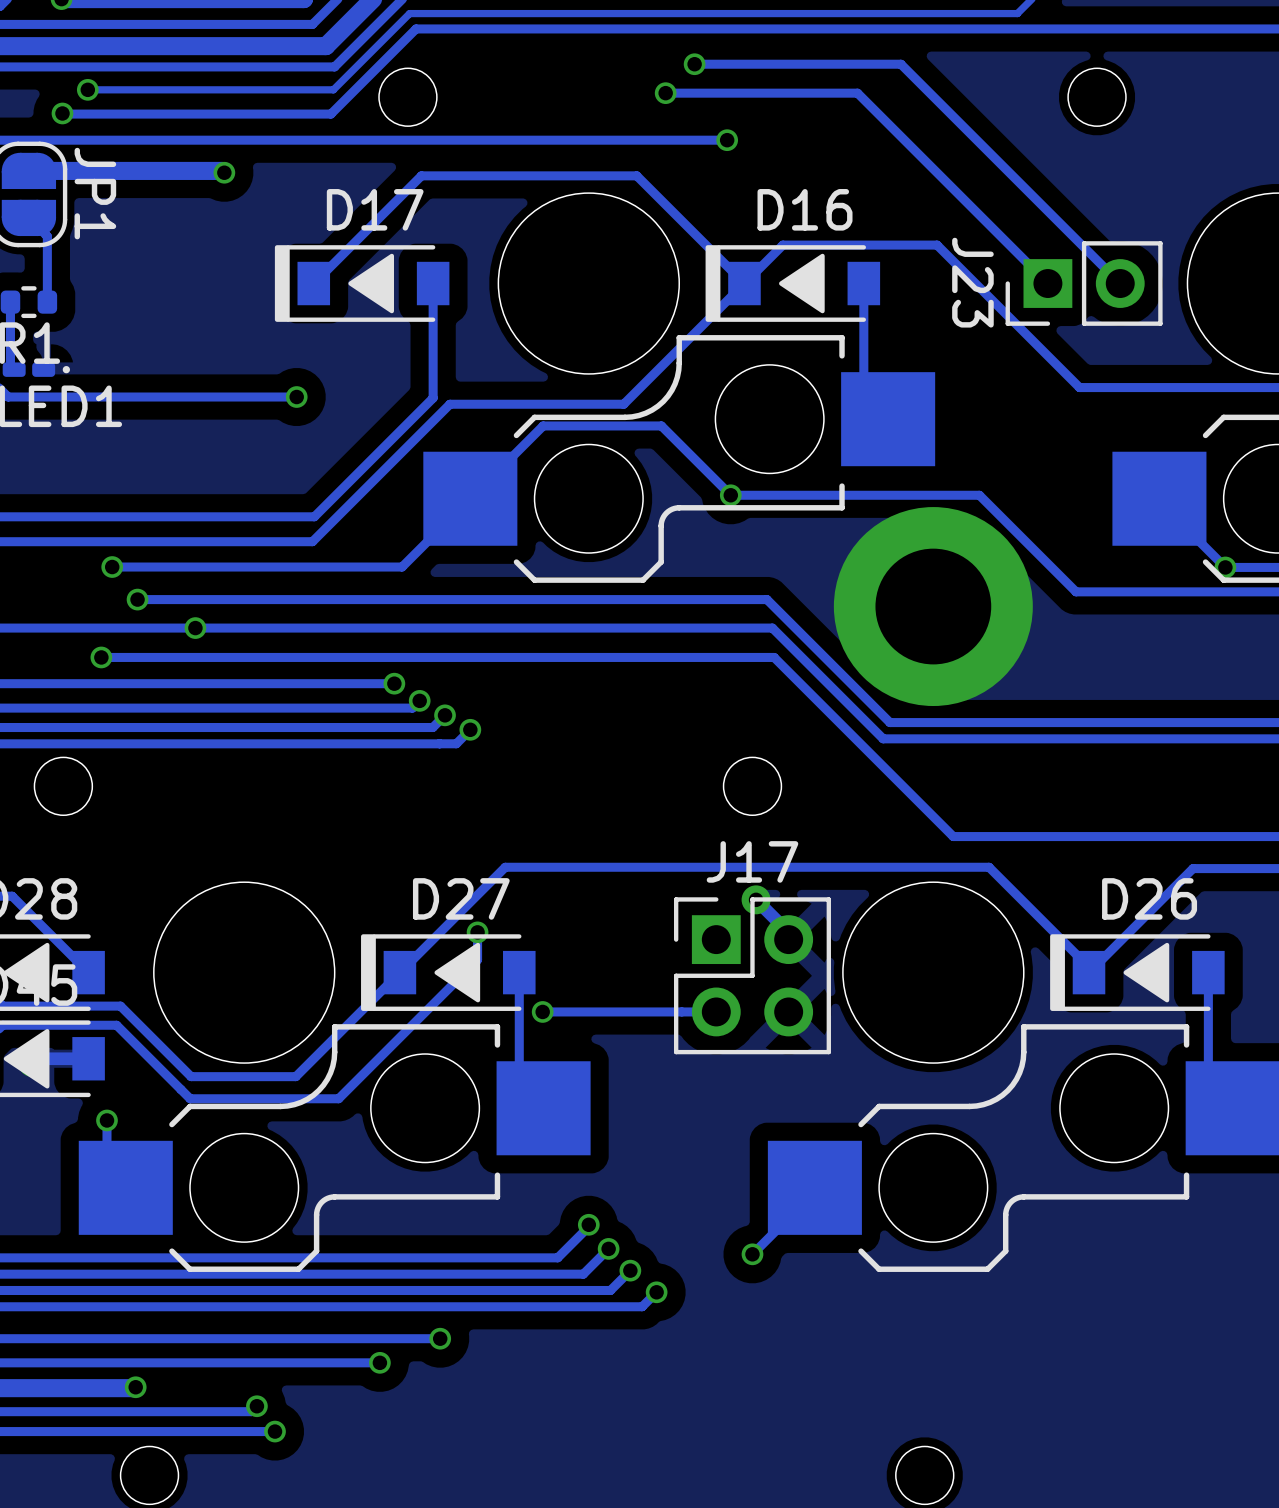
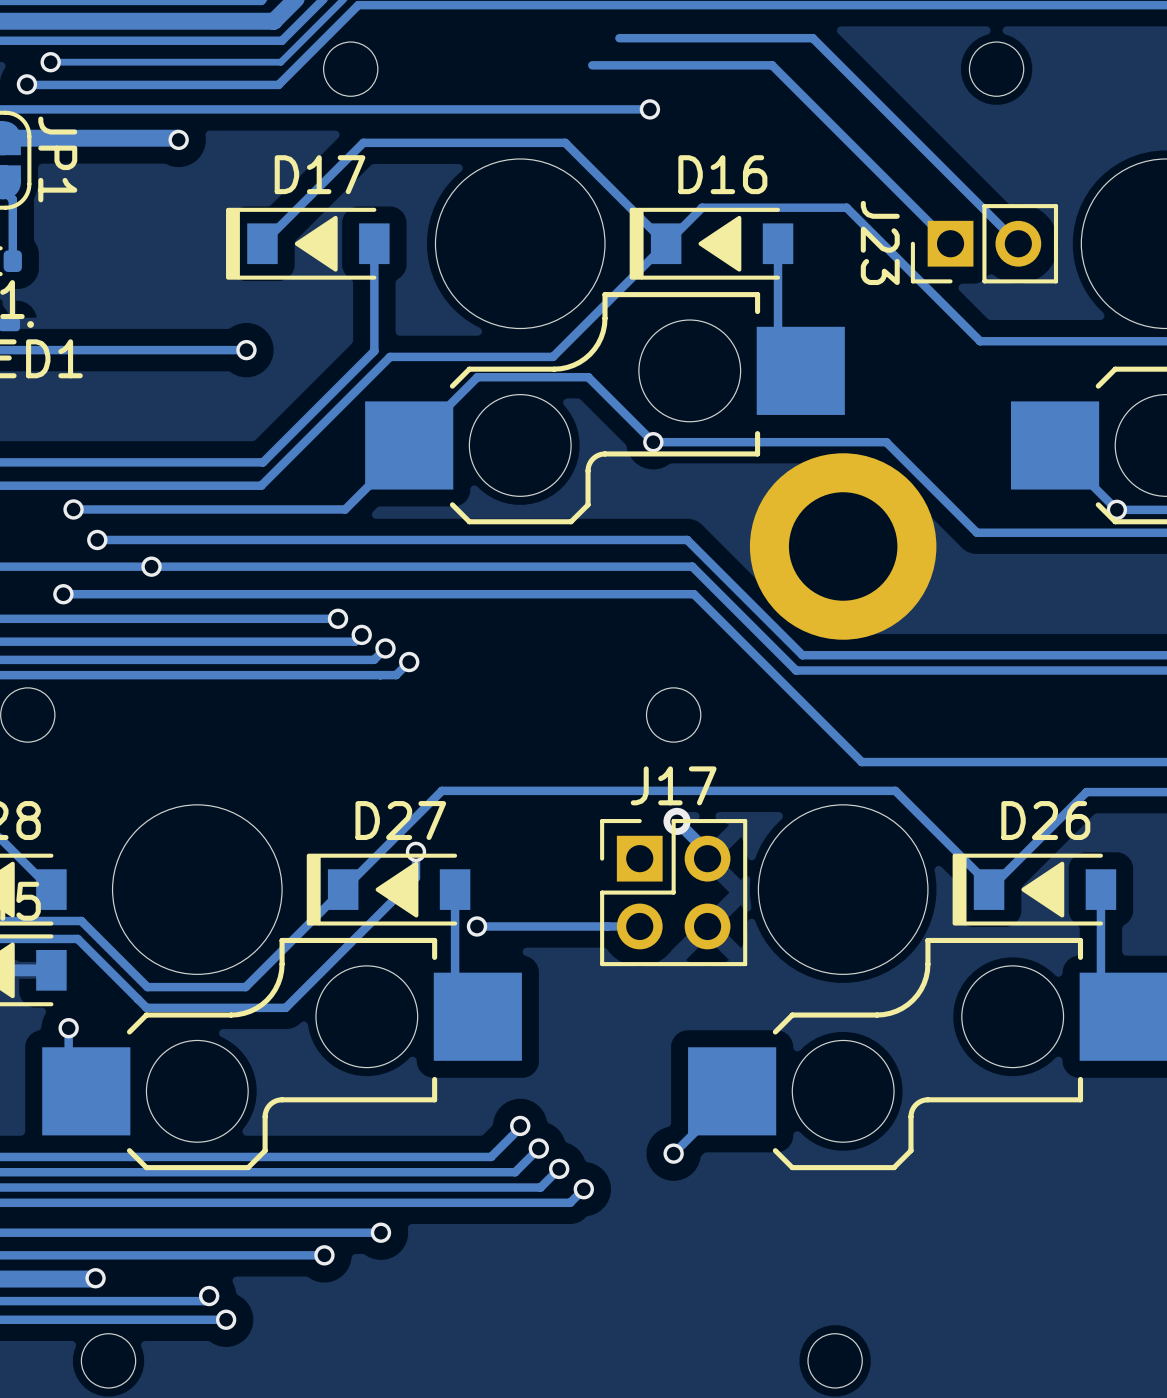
via: (694, 64) -> none
via: (665, 93) -> none

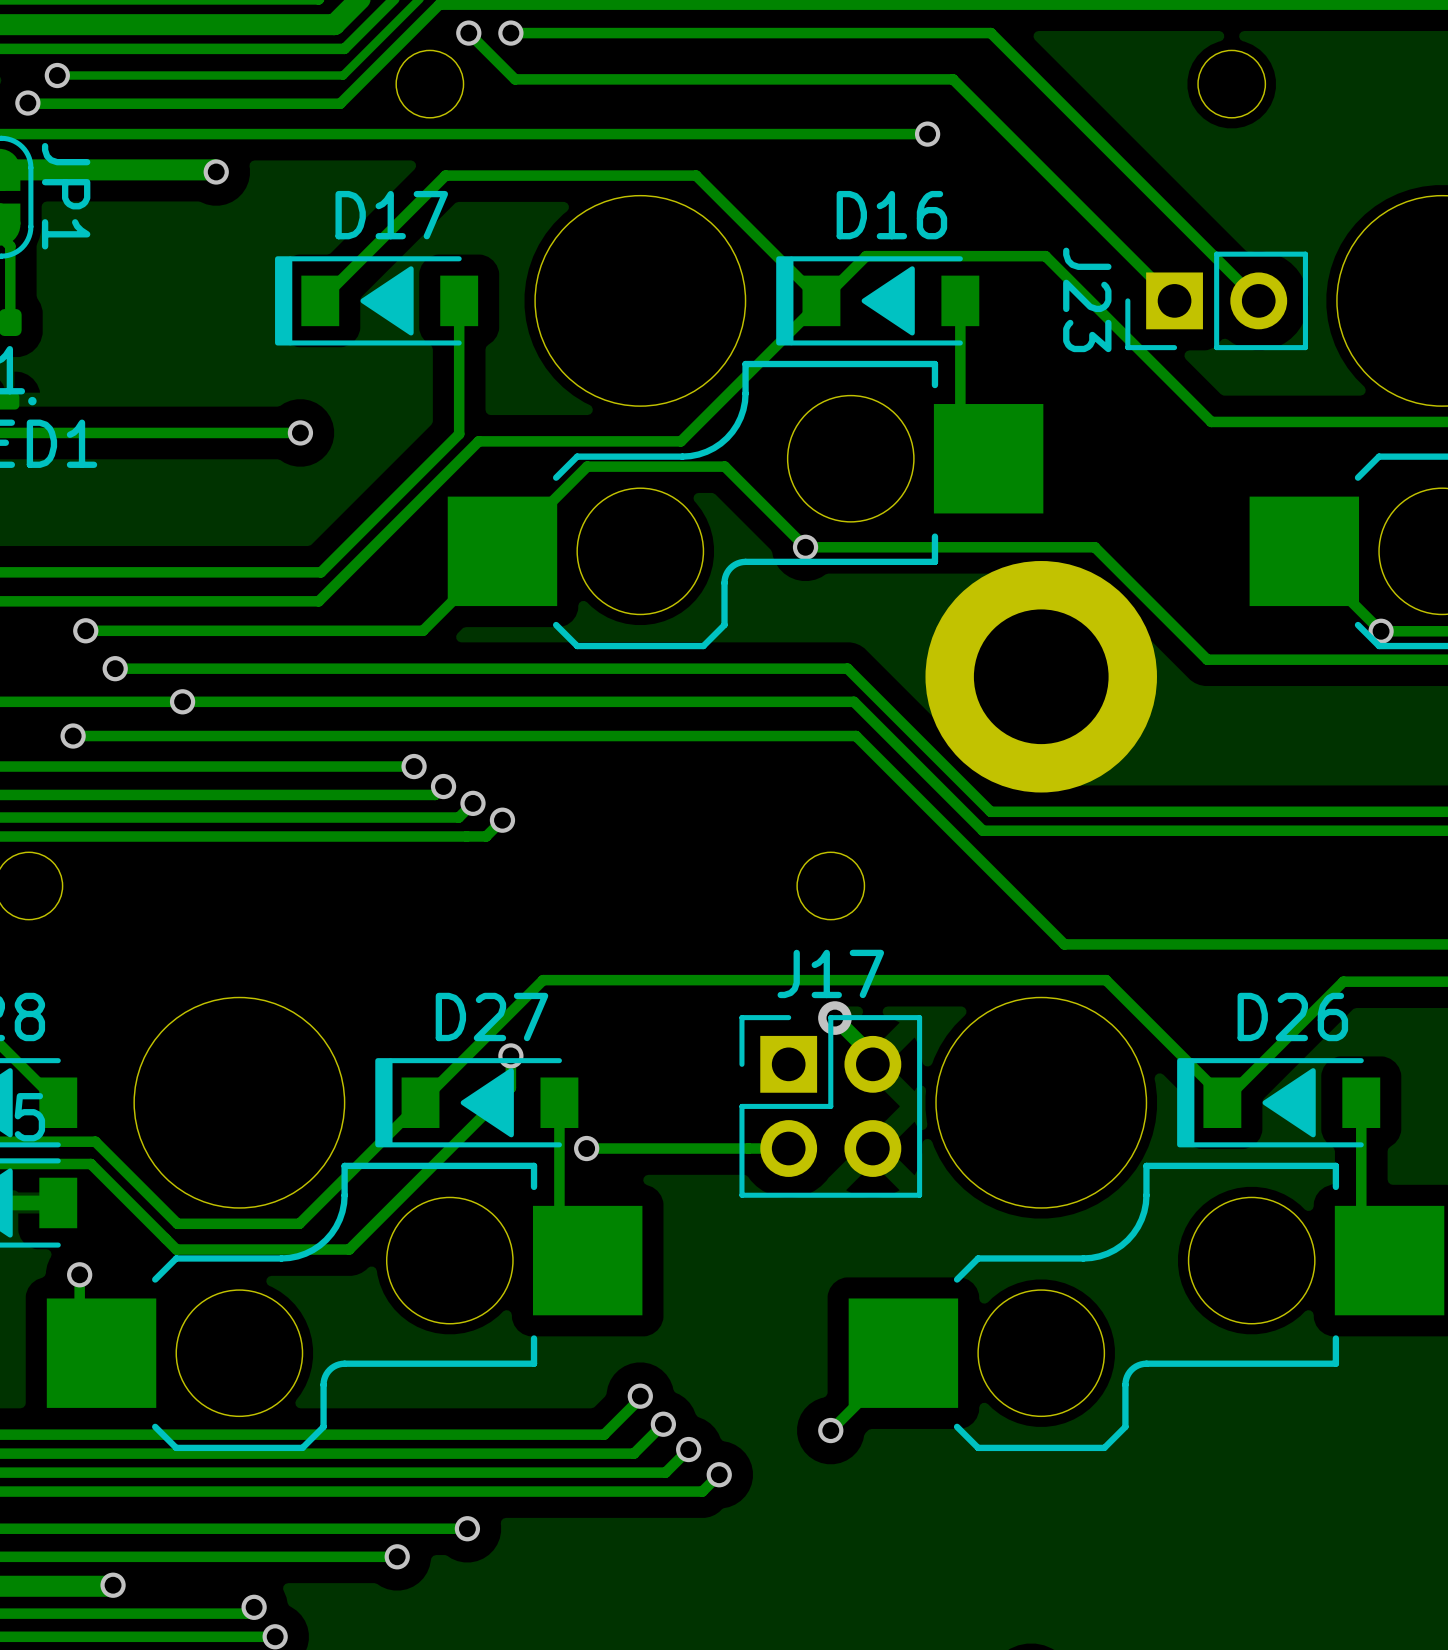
track: none -> (468, 33) (515, 79) (729, 79)
via: none -> (468, 33)
via: none -> (510, 33)
track: (812, 38) (619, 38) -> (1003, 45) (990, 33) (510, 33)
via position: (649, 109) -> (927, 134)
track: none -> (927, 134) (801, 134)

